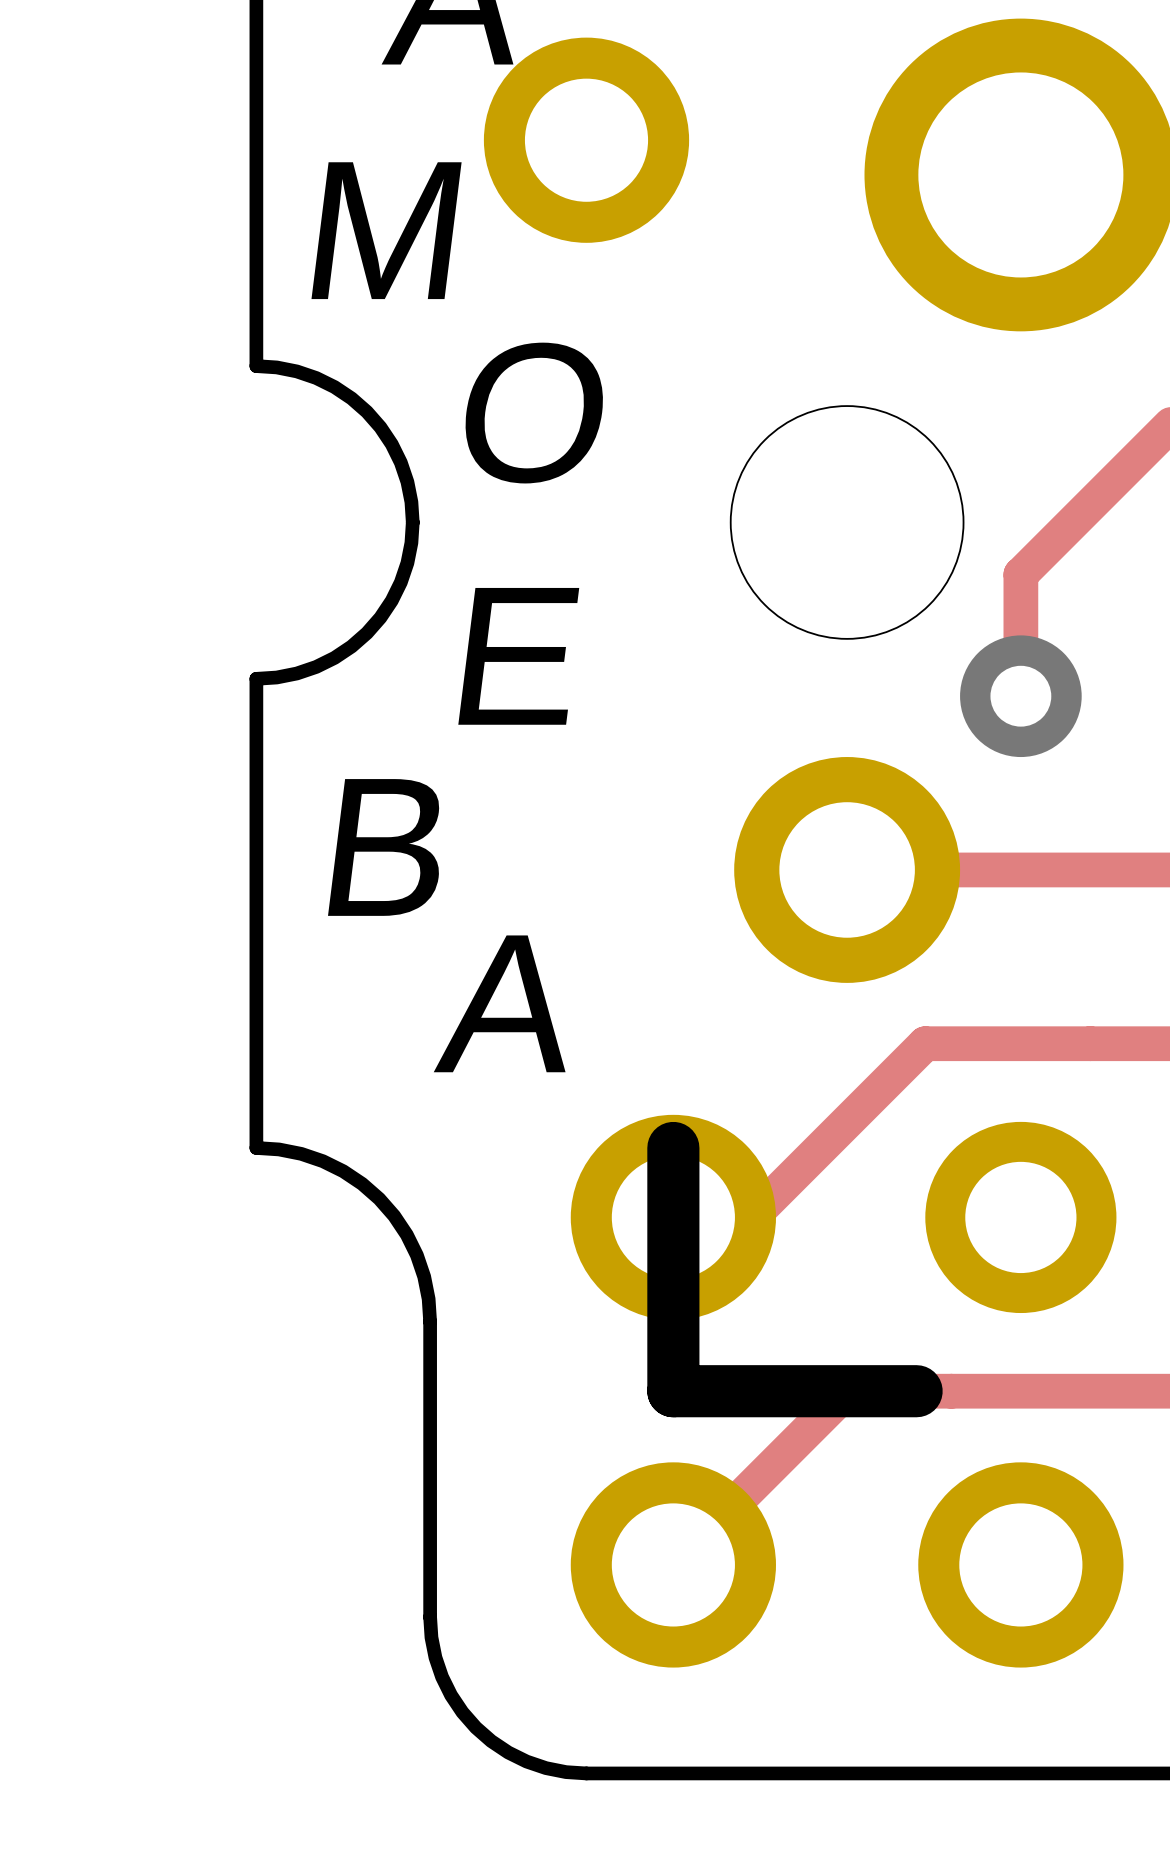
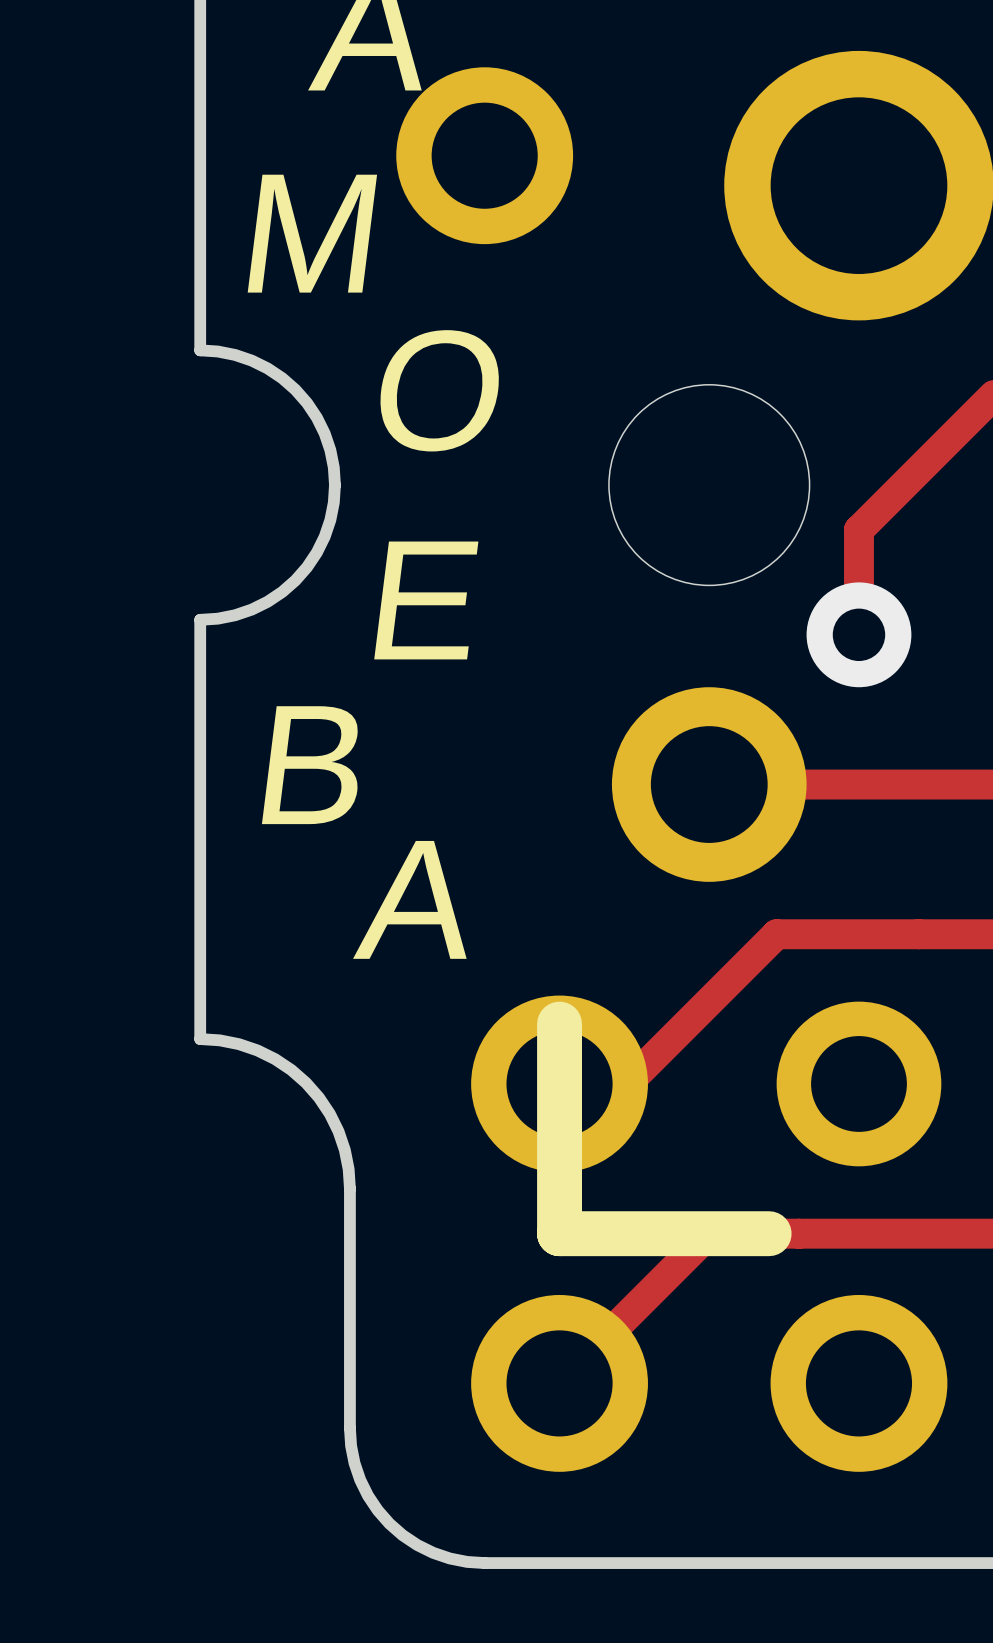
board edge: (256, 1147) (279, 1149) (322, 1161) (343, 1171) (379, 1198) (406, 1234) (416, 1255) (428, 1299) (430, 1339) -> (200, 1024) (200, 1039) (219, 1040) (257, 1050) (291, 1069) (306, 1082) (329, 1113) (338, 1131) (344, 1150) (349, 1188)

